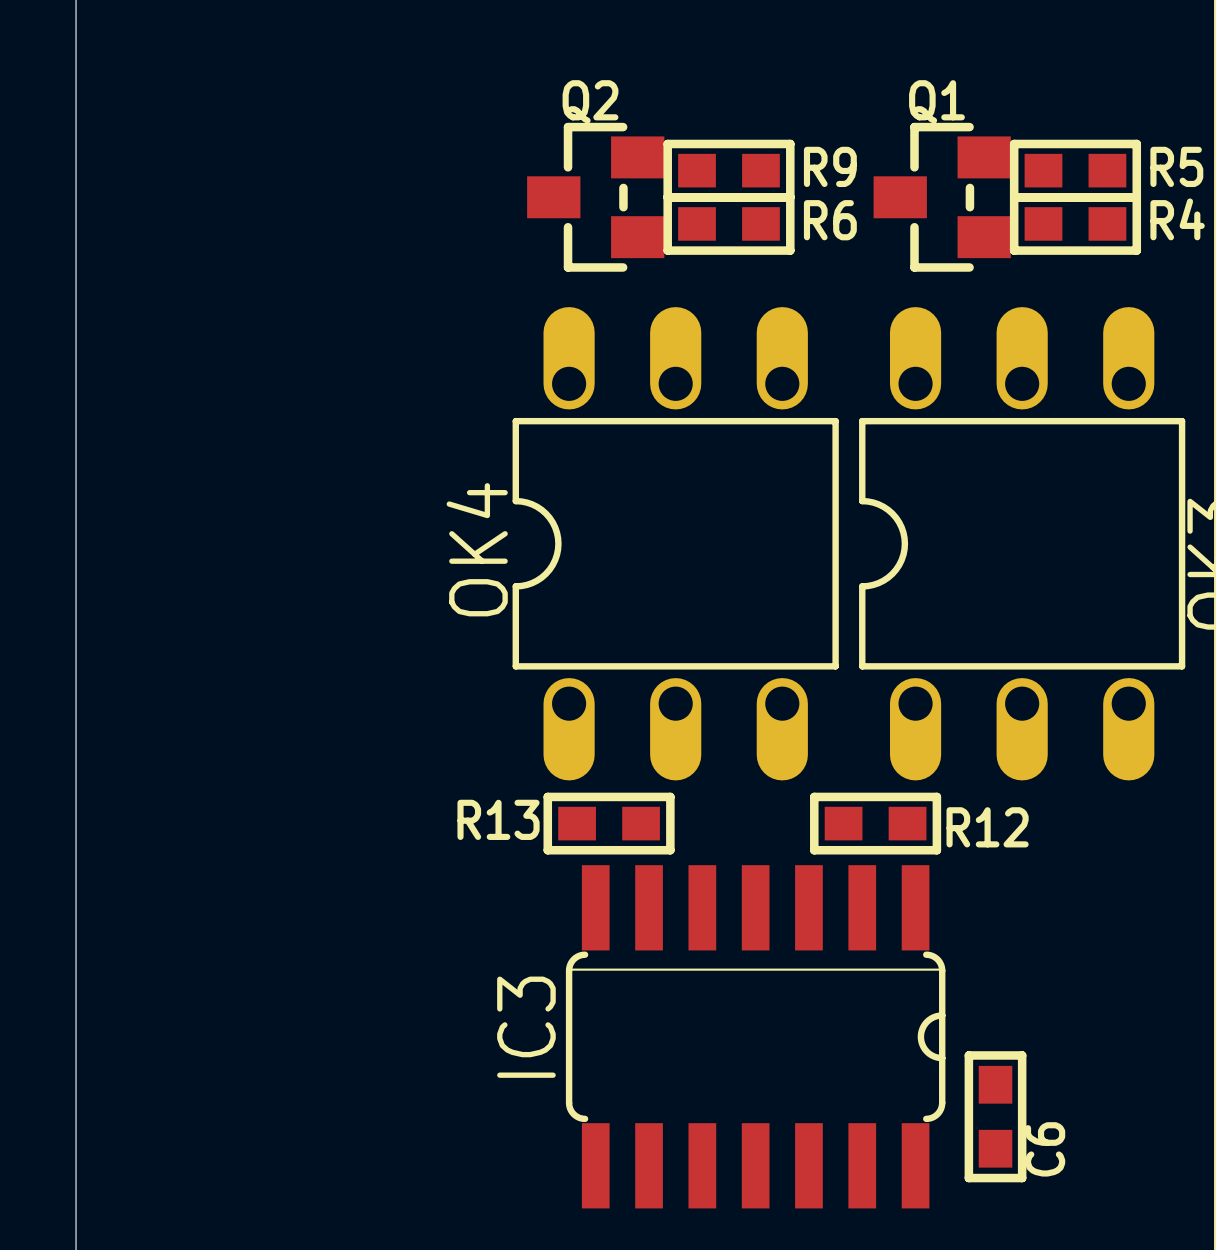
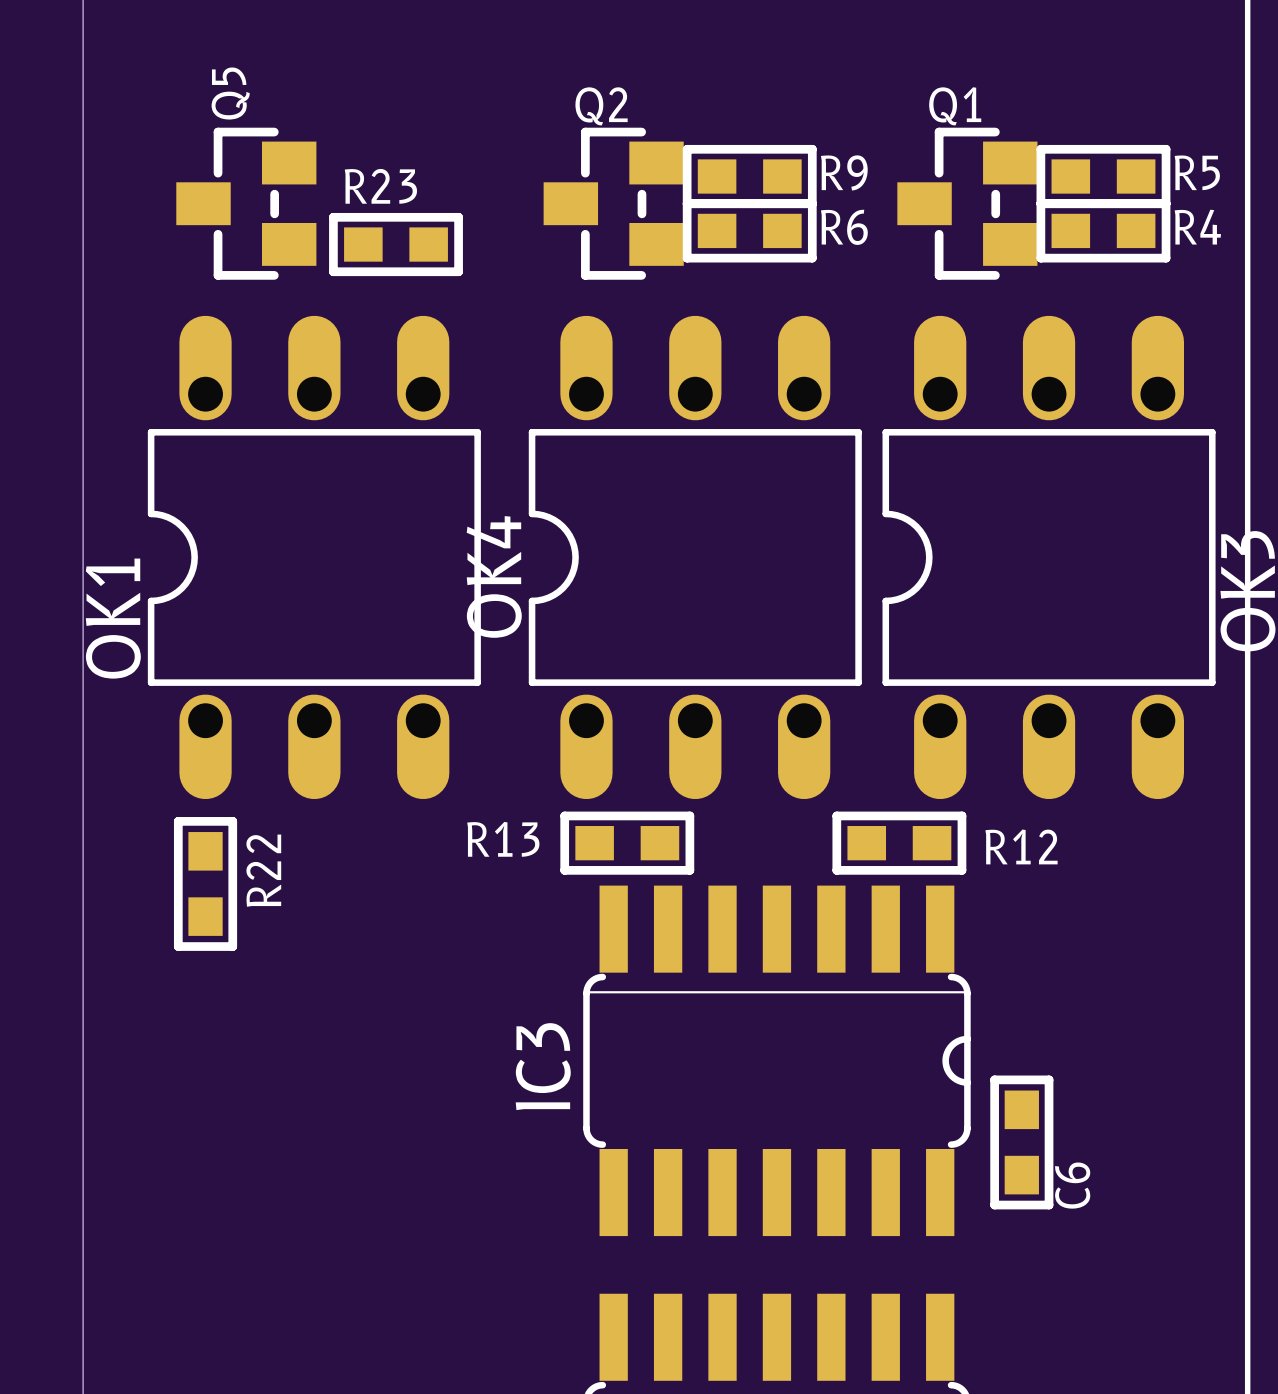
Q5: none -> (246, 203)
R23: none -> (396, 244)
OK1: none -> (314, 557)
R22: none -> (205, 883)

